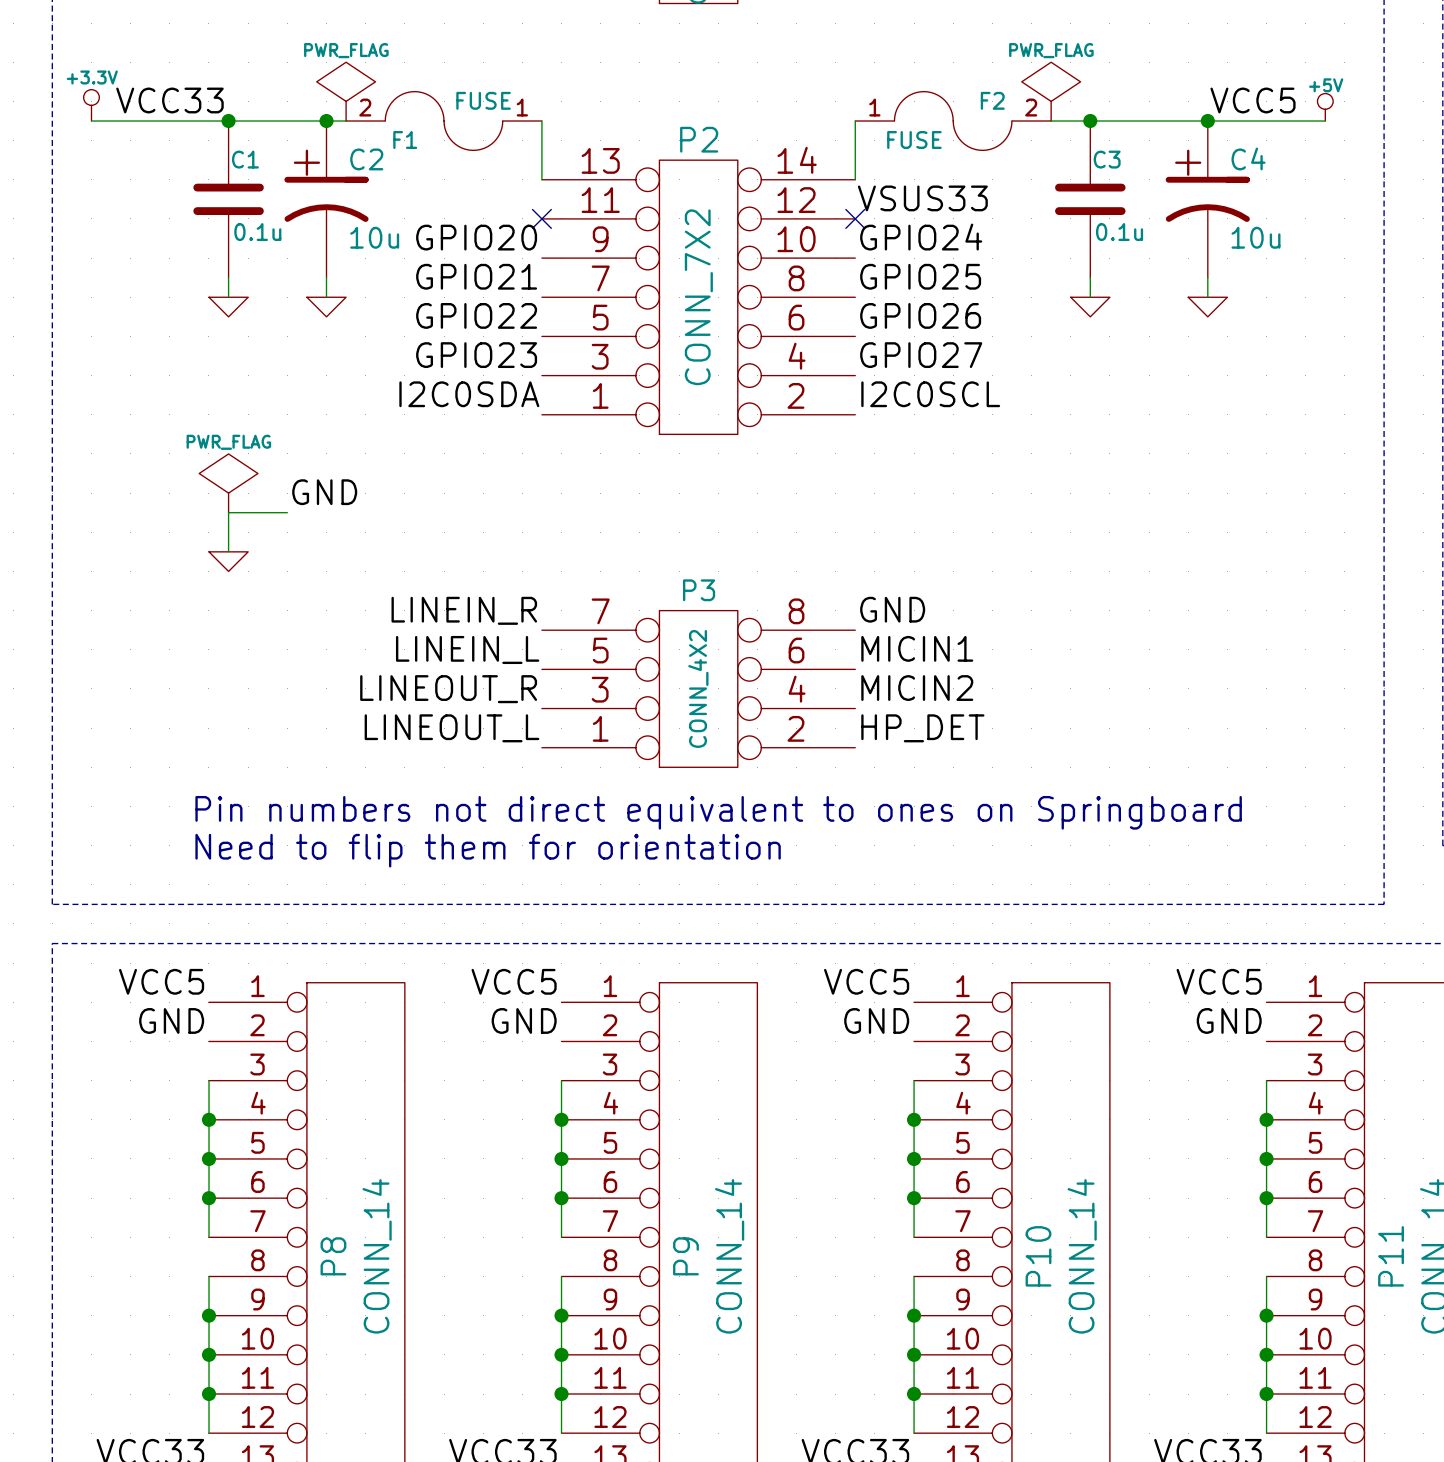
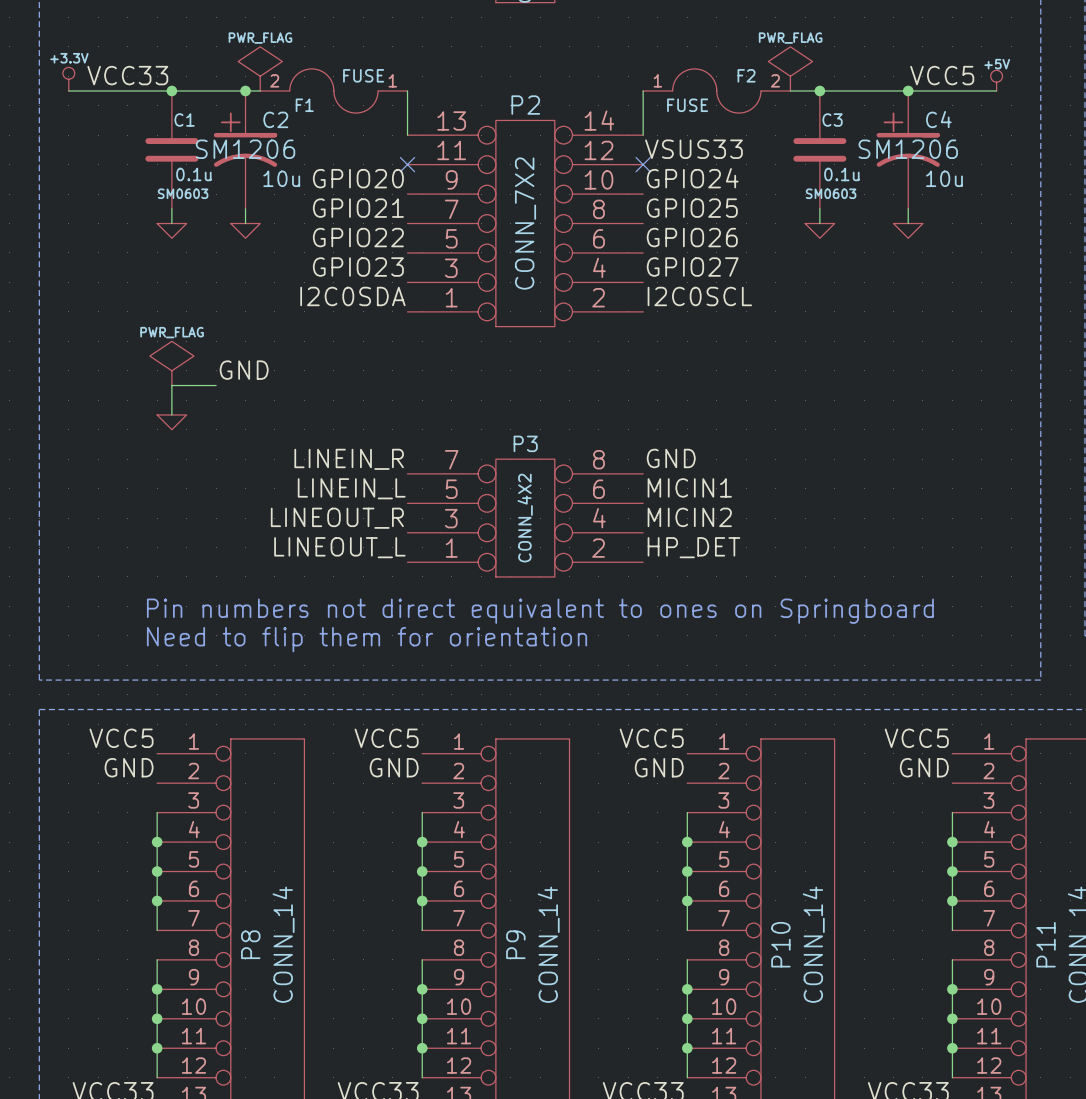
C2 text: none -> SM1206 (245, 149)
C4 text: none -> SM1206 (908, 149)
C1 text: none -> SM0603 (183, 193)
C3 text: none -> SM0603 (831, 193)

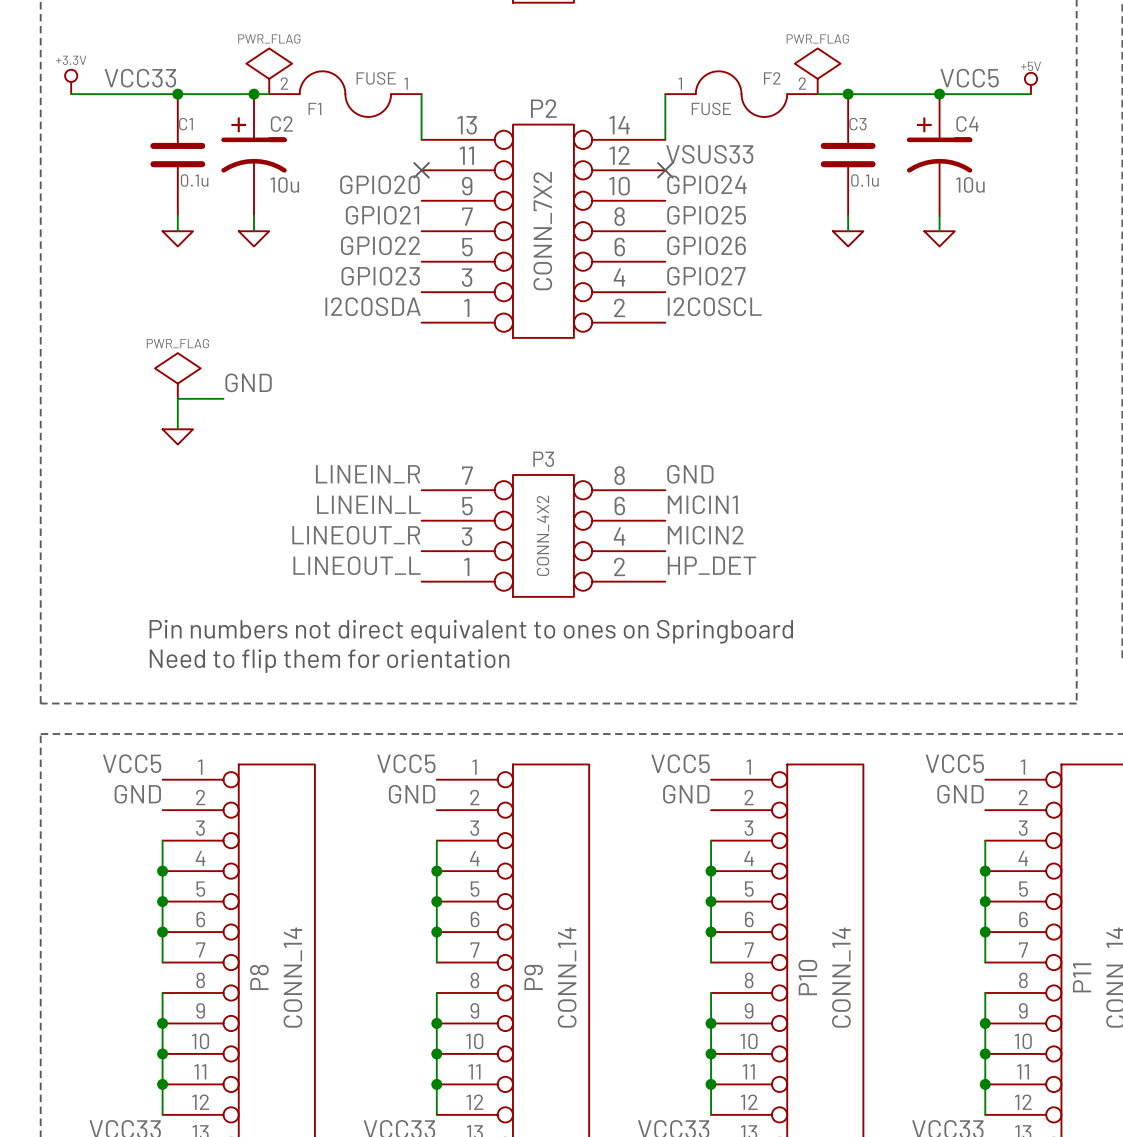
C2 text: SM1206 (245, 149) -> none
C4 text: SM1206 (908, 149) -> none
C1 text: SM0603 (183, 193) -> none
C3 text: SM0603 (831, 193) -> none

